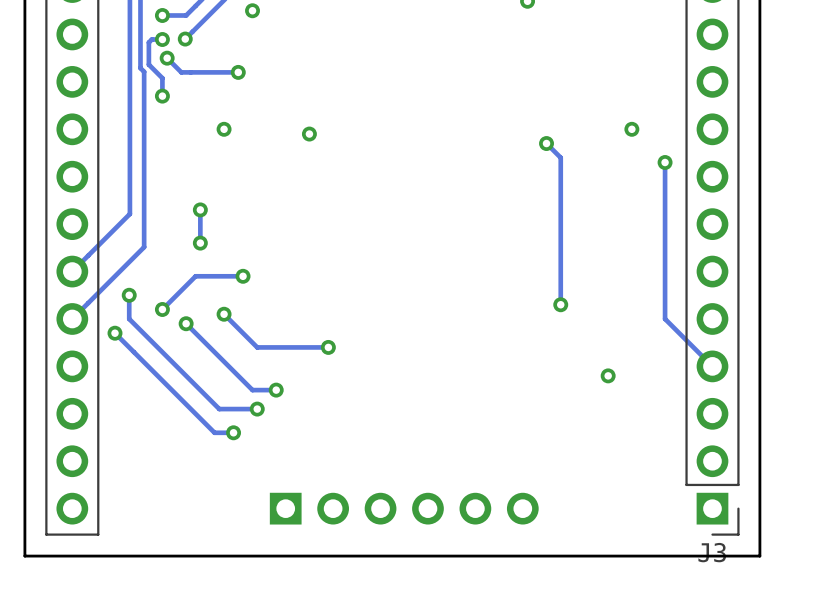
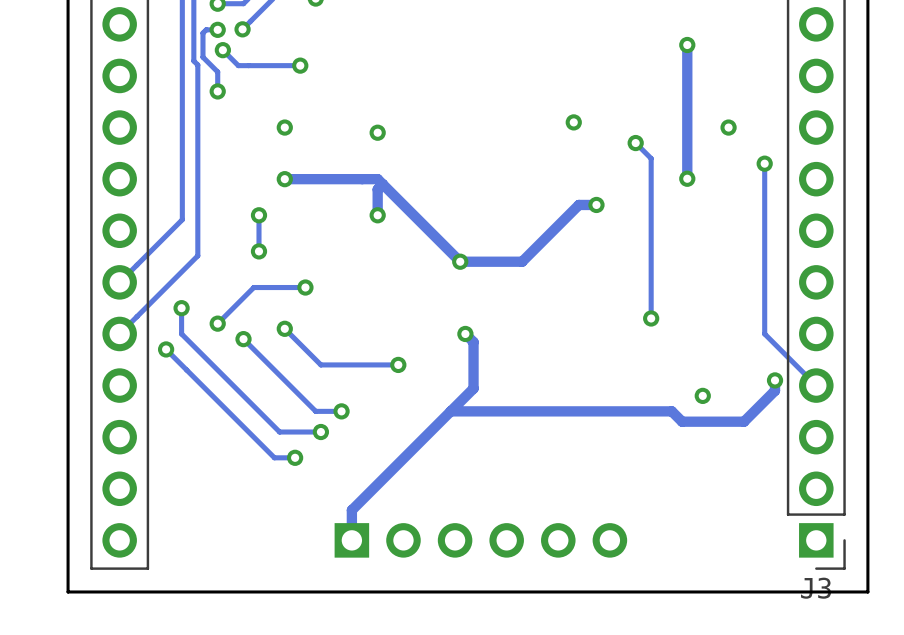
track: none -> (687, 44) (687, 178)
via: none -> (687, 44)
via: none -> (573, 122)
track: none -> (284, 179) (377, 179) (460, 261) (522, 261) (578, 204) (596, 204)
via: none -> (284, 179)
via: none -> (687, 178)
track: none -> (382, 184) (377, 189) (377, 215)
via: none -> (596, 204)
via: none -> (377, 215)
via: none -> (460, 261)
track: none -> (465, 333) (473, 342) (473, 388) (351, 510) (351, 537)
via: none -> (465, 333)
track: none -> (775, 380) (775, 390) (744, 421) (682, 421) (671, 411) (450, 411)
via: none -> (775, 380)

